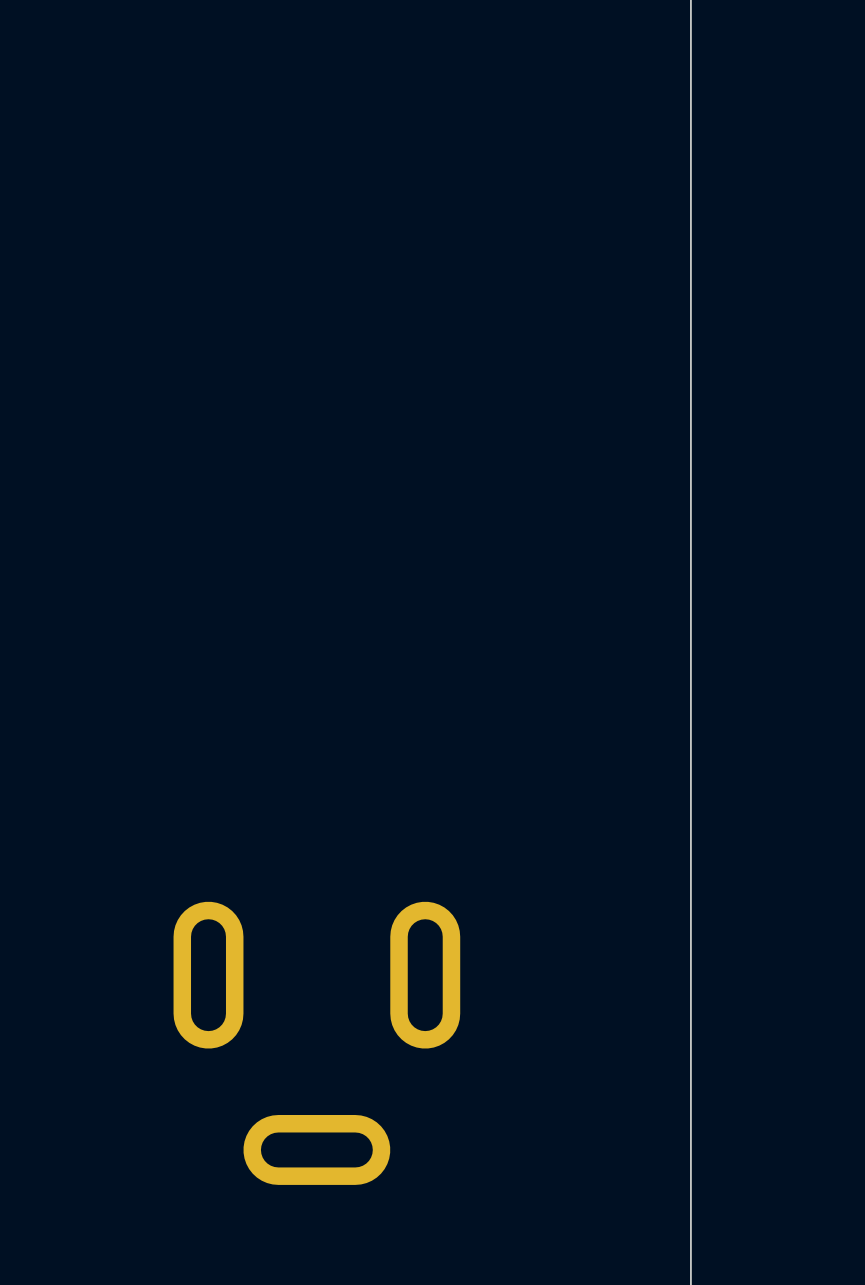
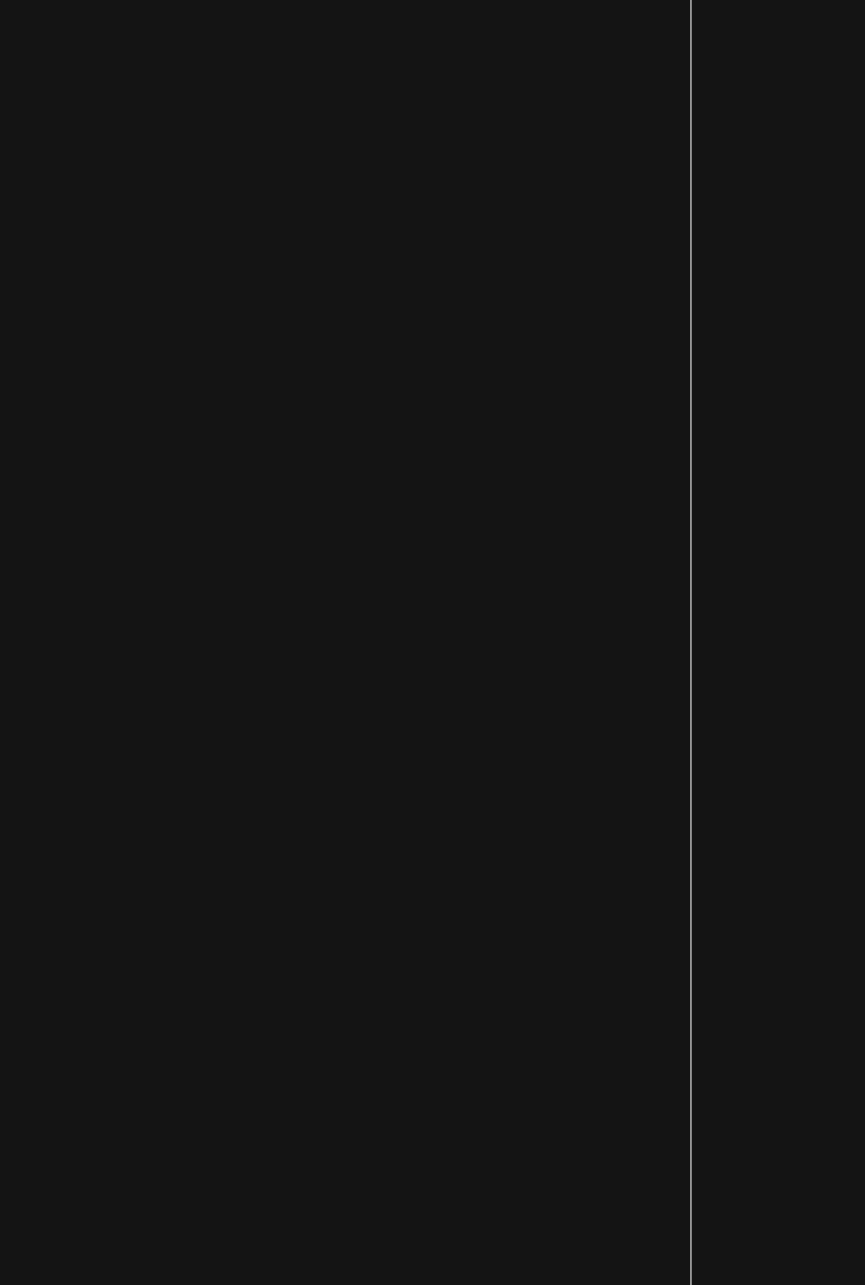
part: (316, 1043) -> none

